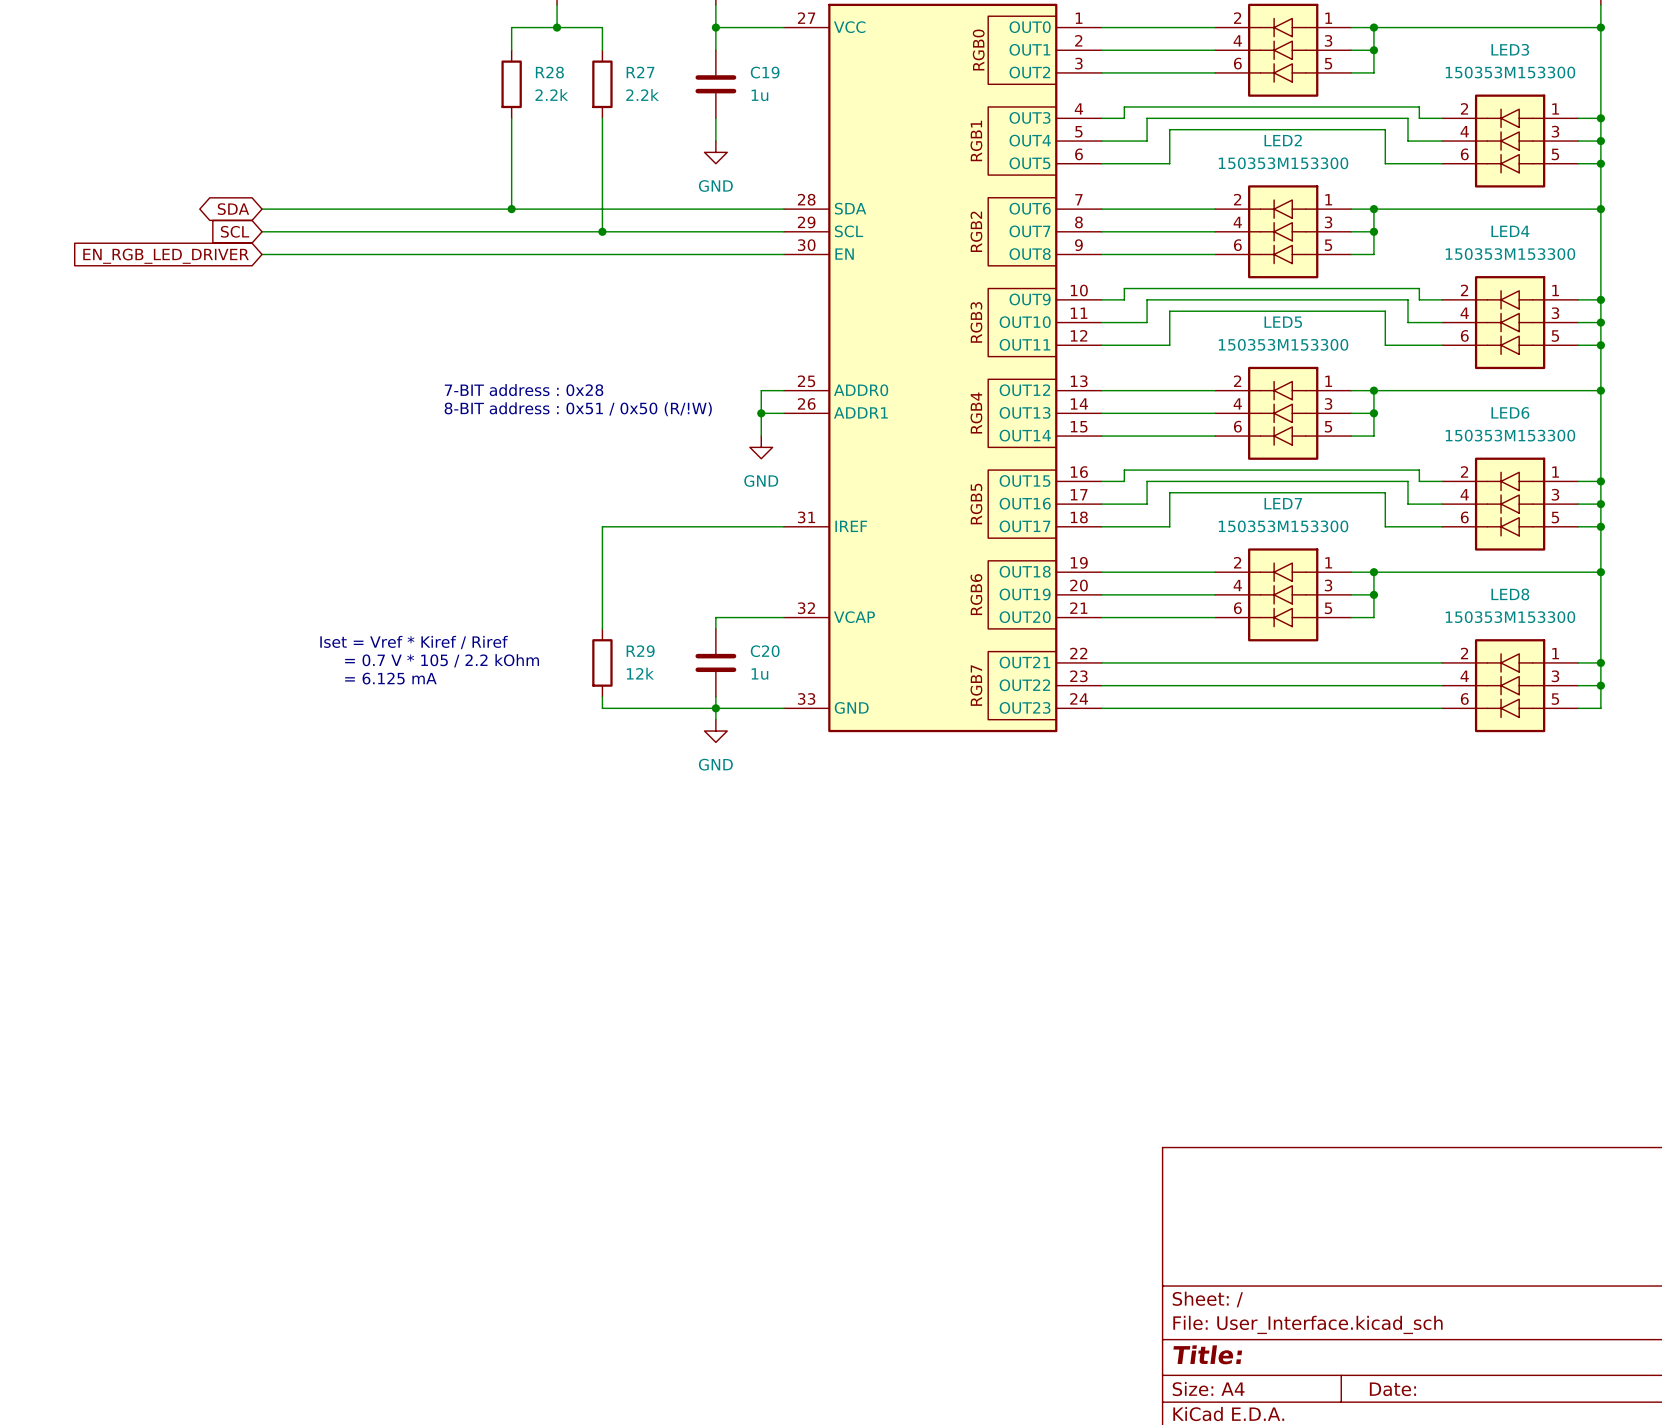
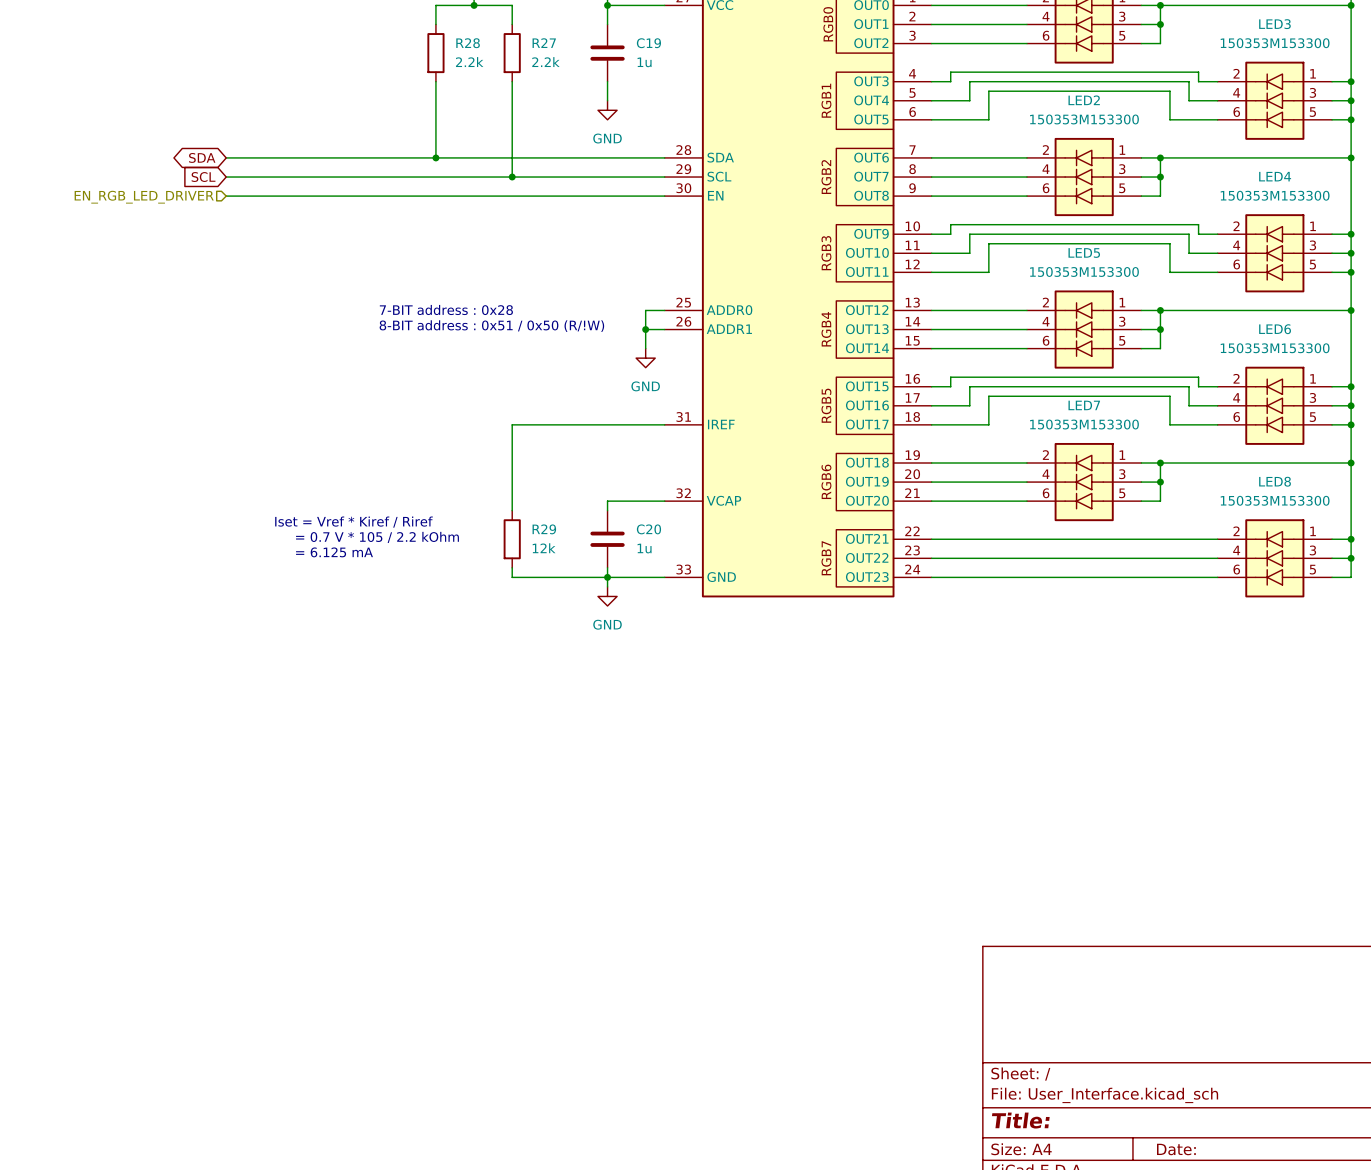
hierarchical label: none -> EN_RGB_LED_DRIVER (144, 197)
global label: EN_RGB_LED_DRIVER (166, 256) -> none

